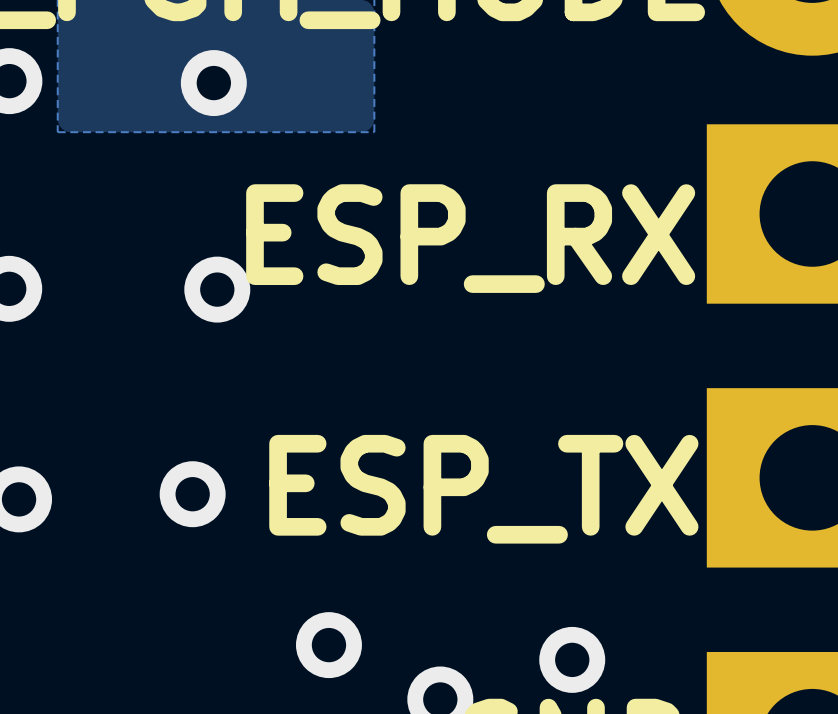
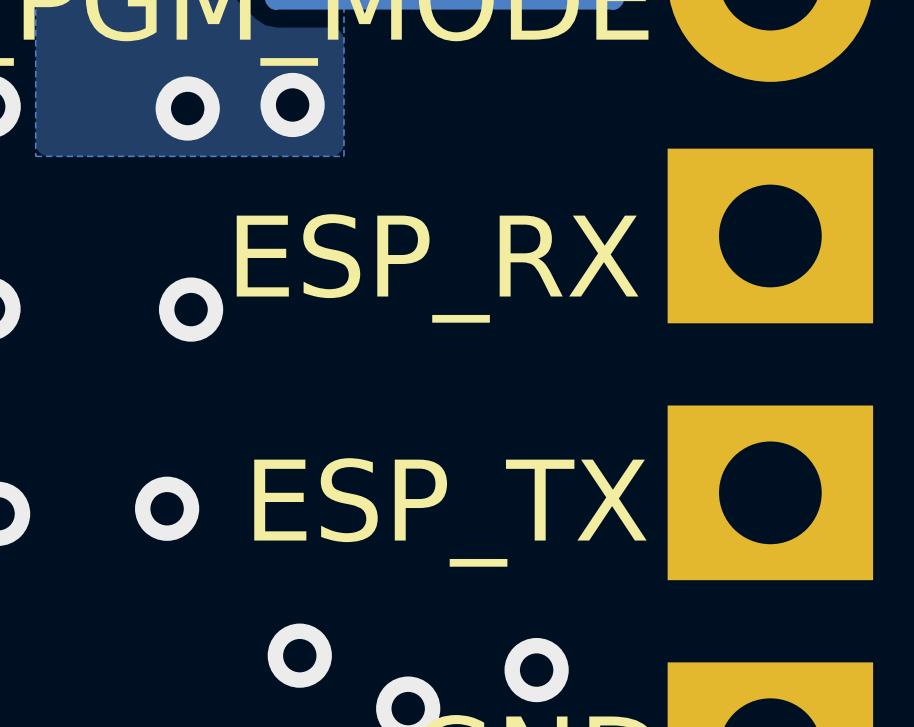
via: none -> (292, 104)

